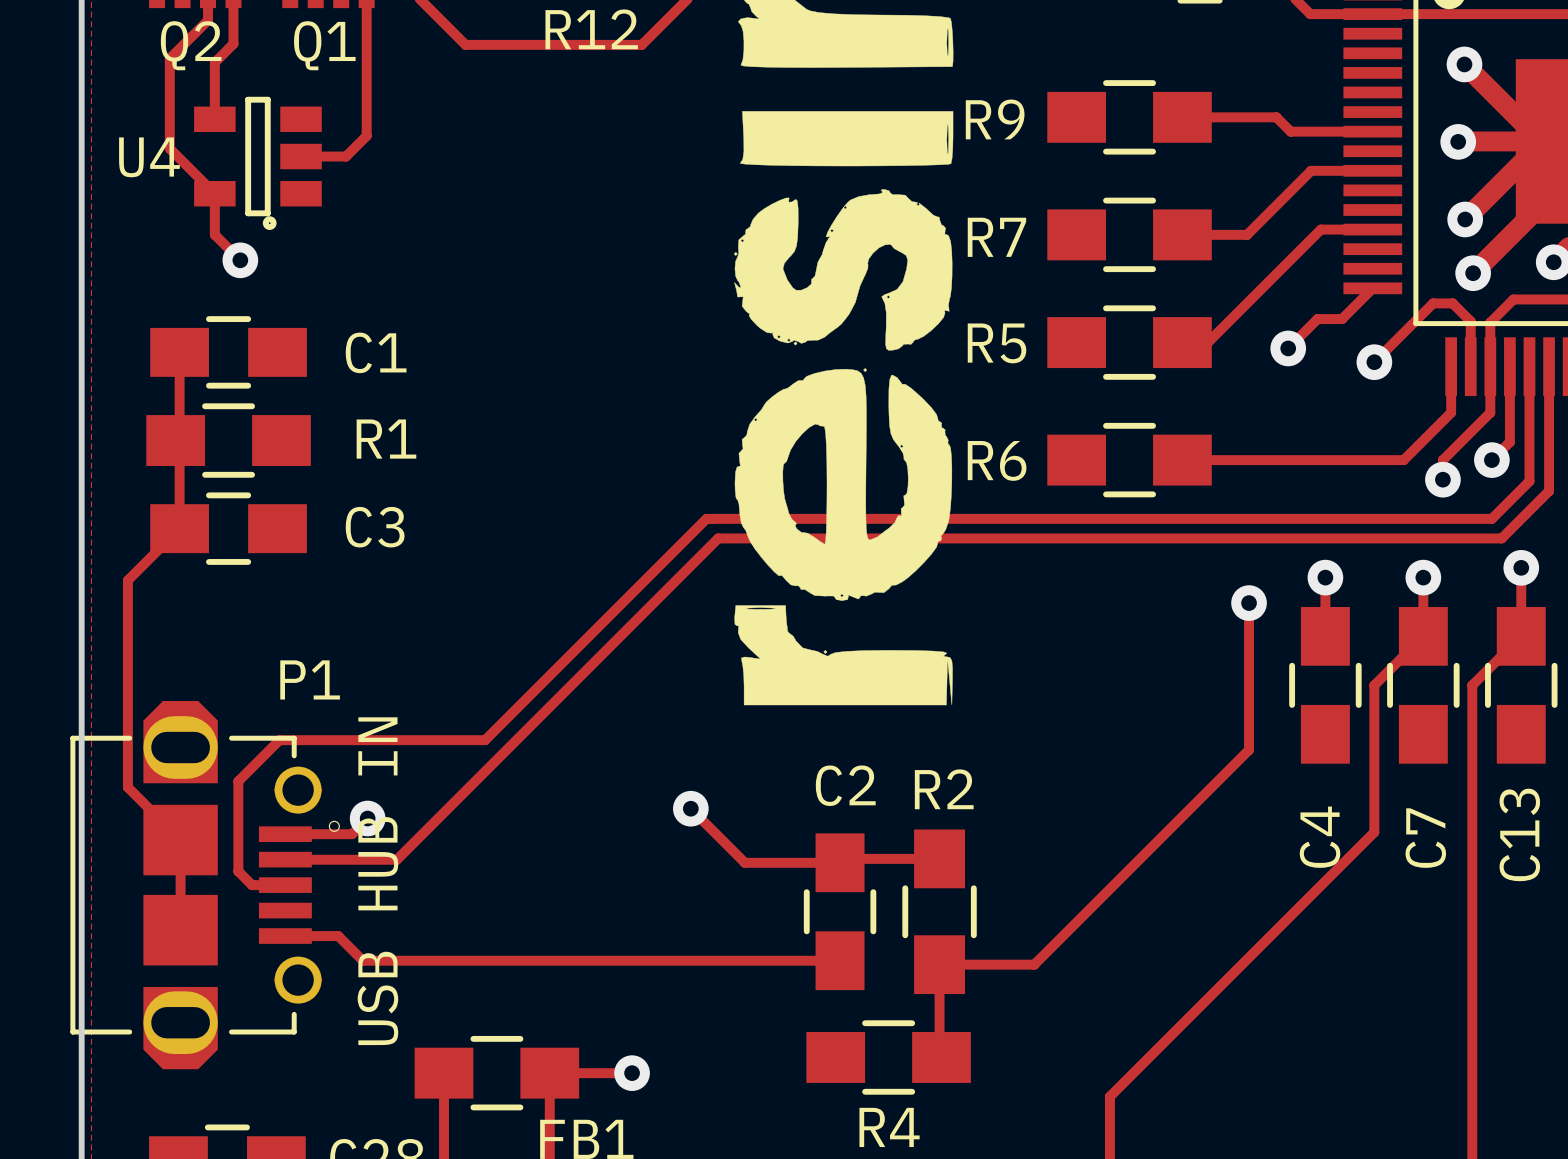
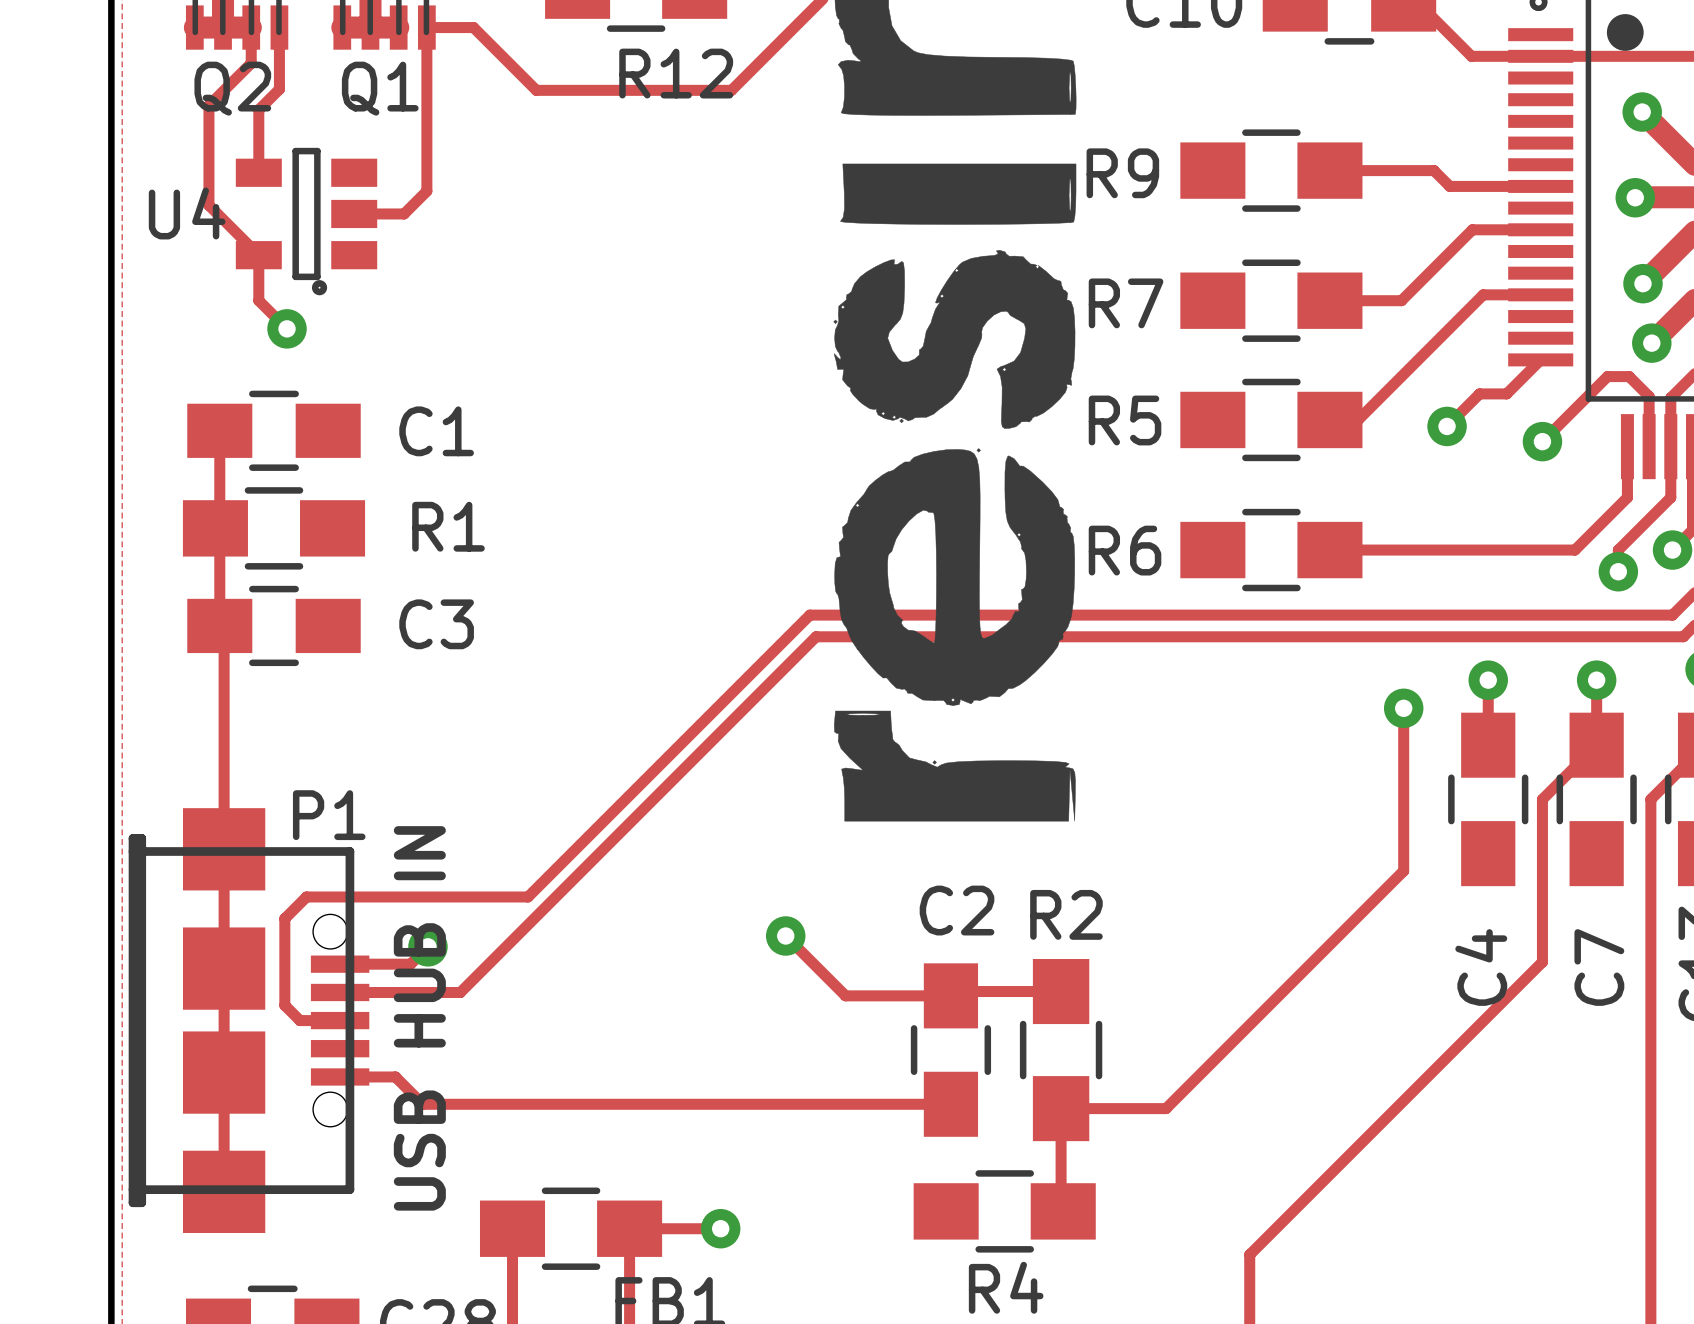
track: (712, 518) (706, 518) (485, 740) (279, 740) (238, 781) (238, 793) -> (809, 615) (528, 896) (306, 896) (284, 918)
track: (179, 528) (127, 580) (127, 787) (180, 840) (180, 930) -> (219, 625) (224, 630) (224, 1191)
P1 footprint: [70, 701, 340, 1070] -> [128, 808, 370, 1234]

